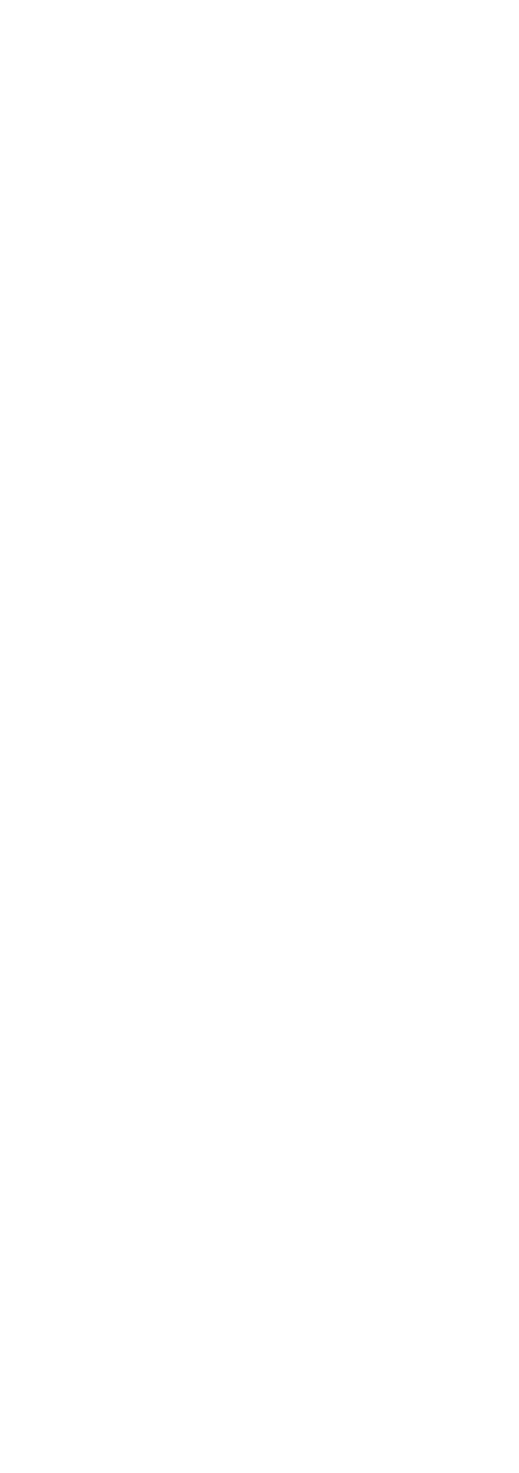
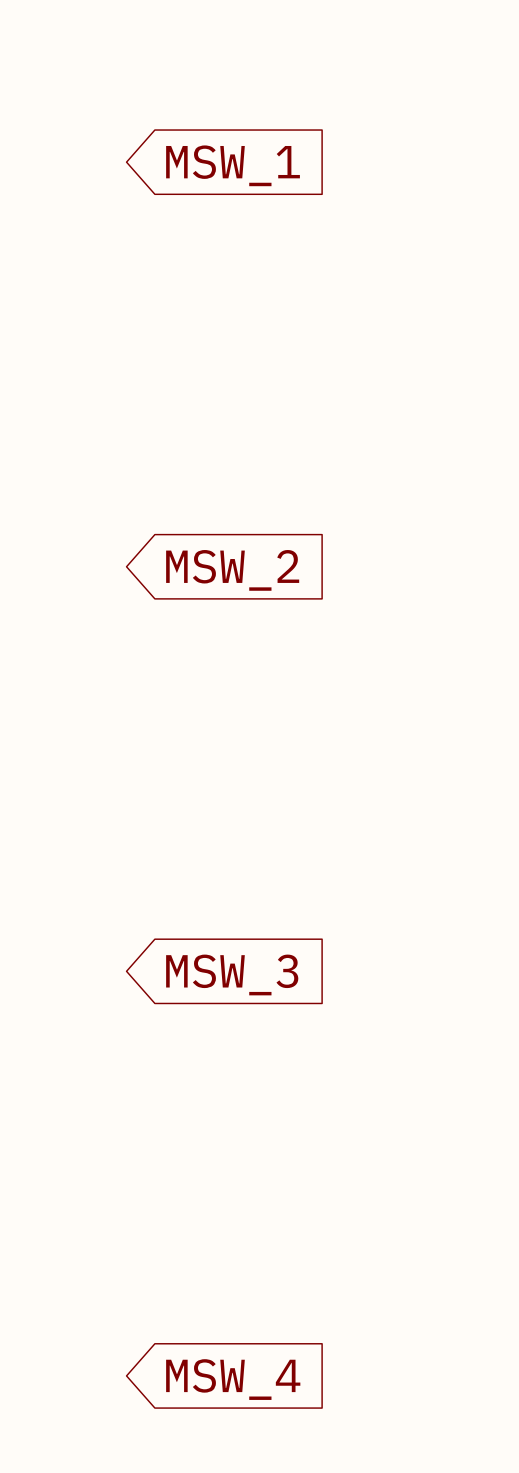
global label: none -> MSW_1 (233, 165)
global label: none -> MSW_2 (232, 570)
global label: none -> MSW_3 (232, 974)
global label: none -> MSW_4 (233, 1379)

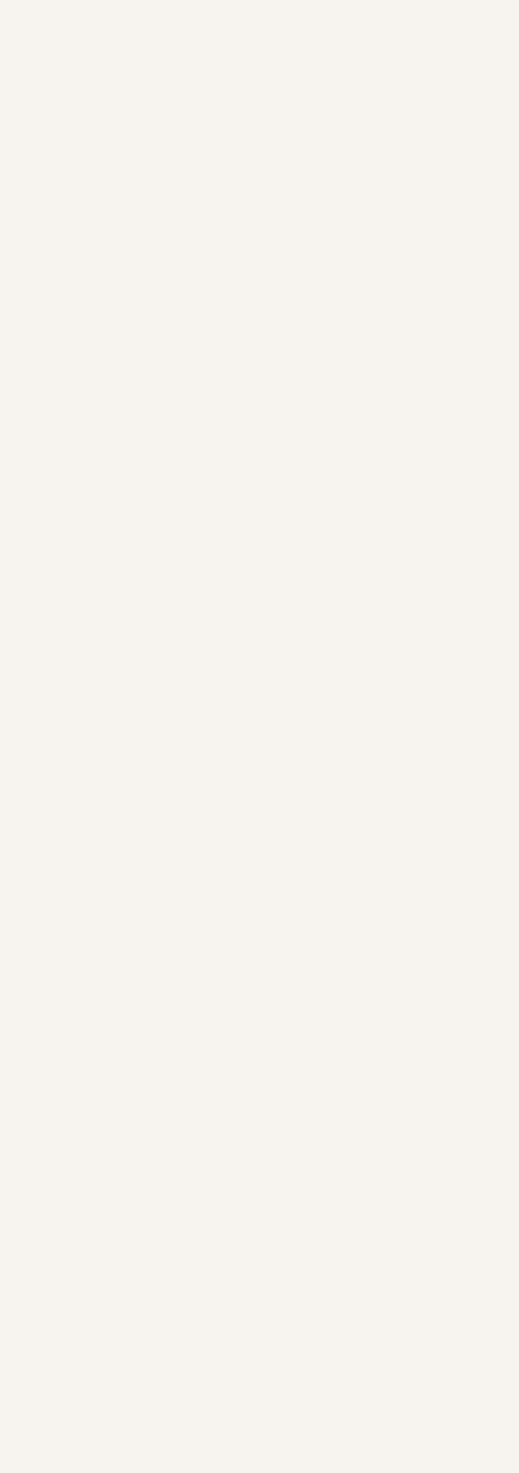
global label: MSW_1 (233, 165) -> none
global label: MSW_2 (232, 570) -> none
global label: MSW_3 (232, 974) -> none
global label: MSW_4 (233, 1379) -> none

